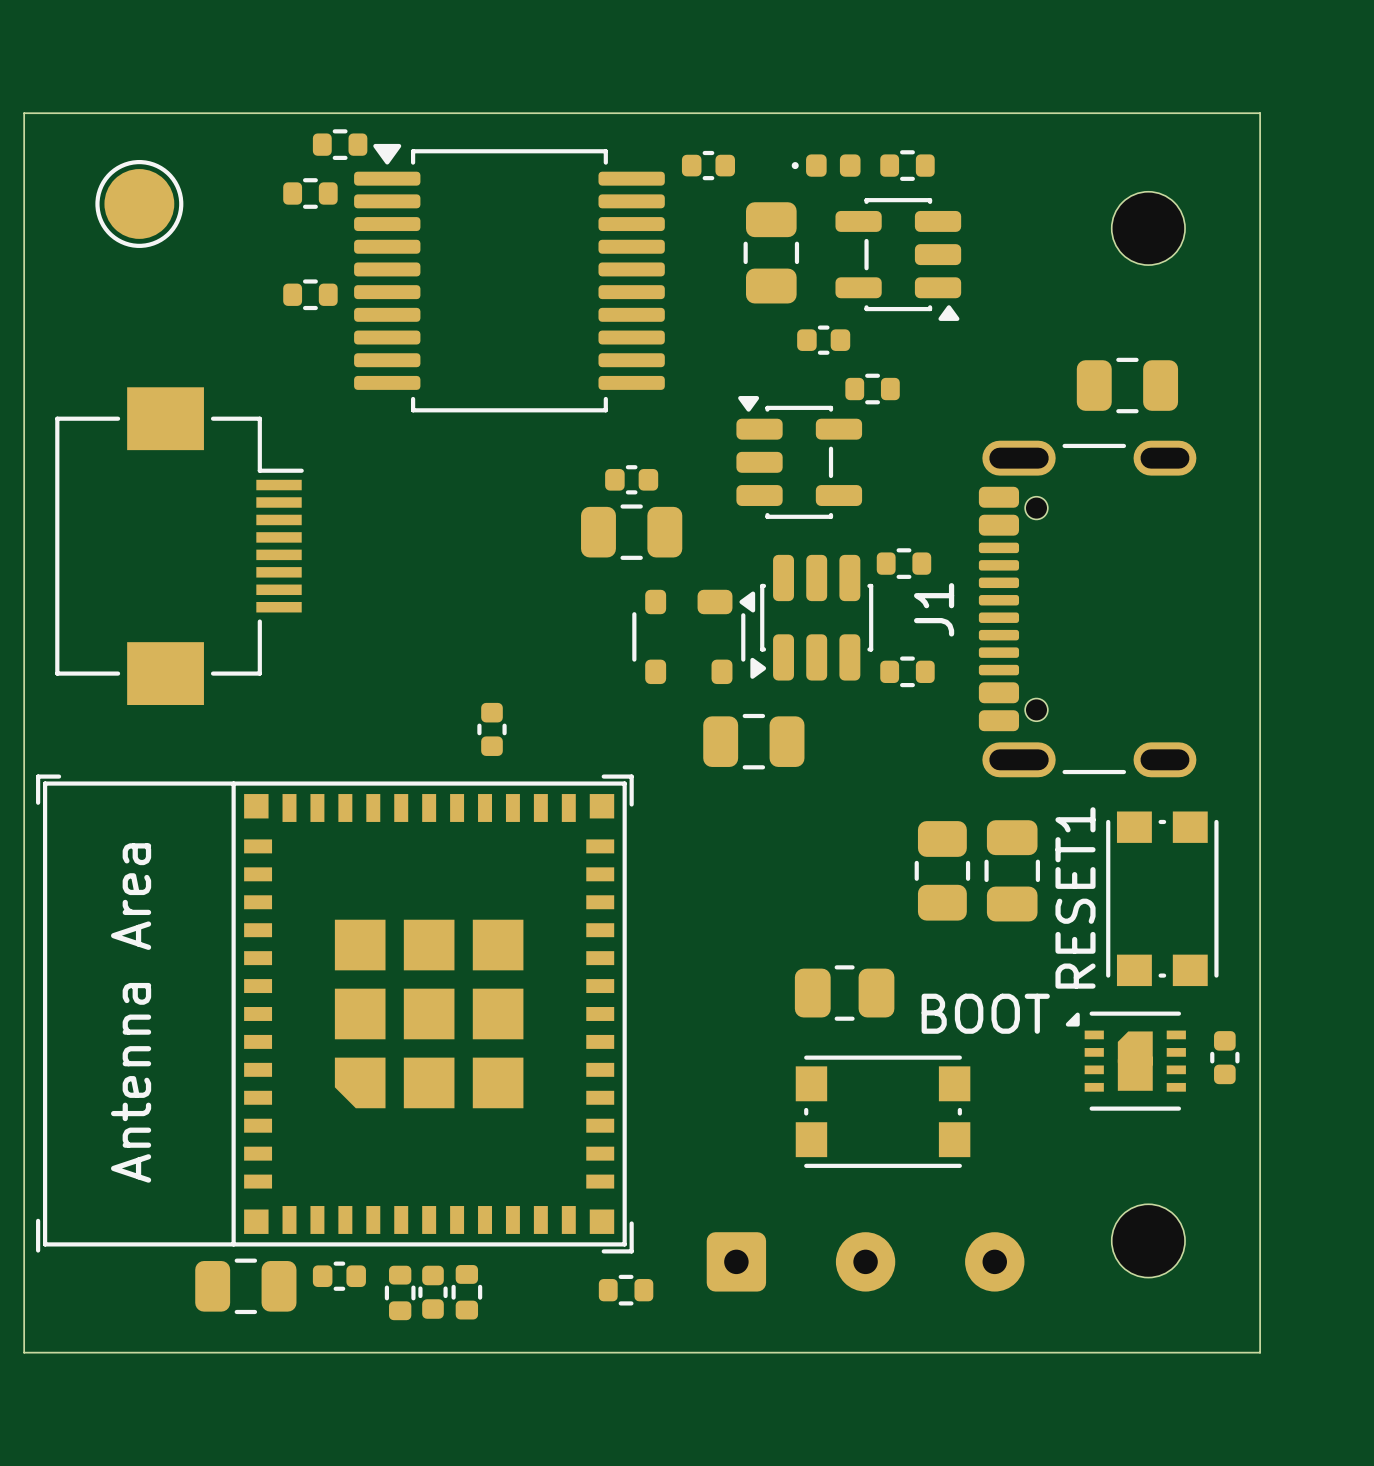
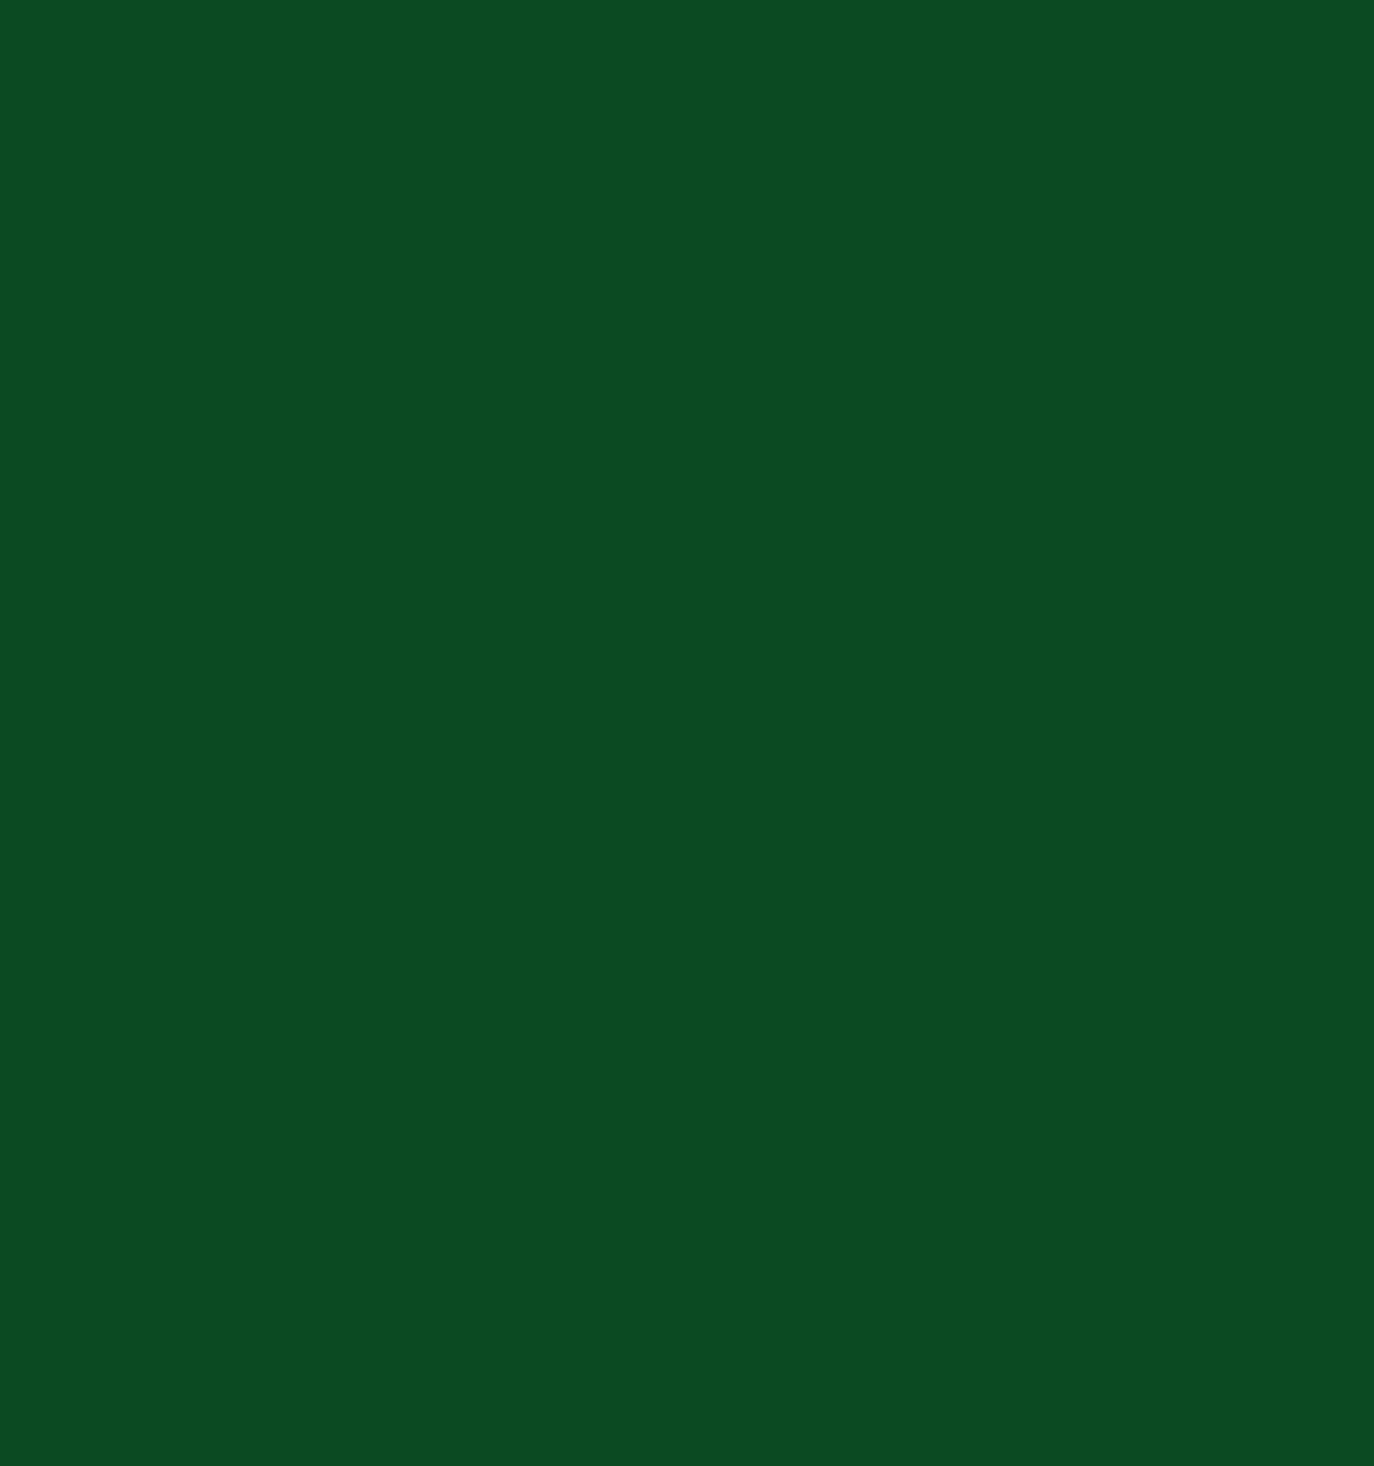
board edge: (24, 113) (1260, 113) (1260, 1352) (24, 1352) (24, 113) -> none
part: (340, 144) -> none
part: (708, 165) -> none
part: (826, 165) -> none
part: (907, 165) -> none
part: (310, 193) -> none
part: (139, 203) -> none
part: (1148, 228) -> none
part: (771, 252) -> none
part: (898, 259) -> none
part: (509, 278) -> none
part: (310, 294) -> none
part: (823, 340) -> none
part: (1127, 385) -> none
part: (872, 389) -> none
part: (799, 457) -> none
part: (631, 479) -> none
part: (631, 532) -> none
part: (179, 546) -> none
part: (903, 563) -> none
J1: (1087, 608) -> none
part: (811, 617) -> none
part: (693, 636) -> none
part: (907, 671) -> none
part: (491, 729) -> none
part: (753, 741) -> none
part: (942, 870) -> none
part: (1012, 870) -> none
RESET1: (1162, 898) -> none
part: (844, 993) -> none
part: (334, 1013) -> none
part: (1224, 1057) -> none
part: (1125, 1061) -> none
BOOT: (883, 1111) -> none
part: (1148, 1240) -> none
part: (865, 1261) -> none
part: (339, 1276) -> none
part: (245, 1286) -> none
part: (626, 1290) -> none
part: (400, 1292) -> none
part: (432, 1292) -> none
part: (466, 1292) -> none

